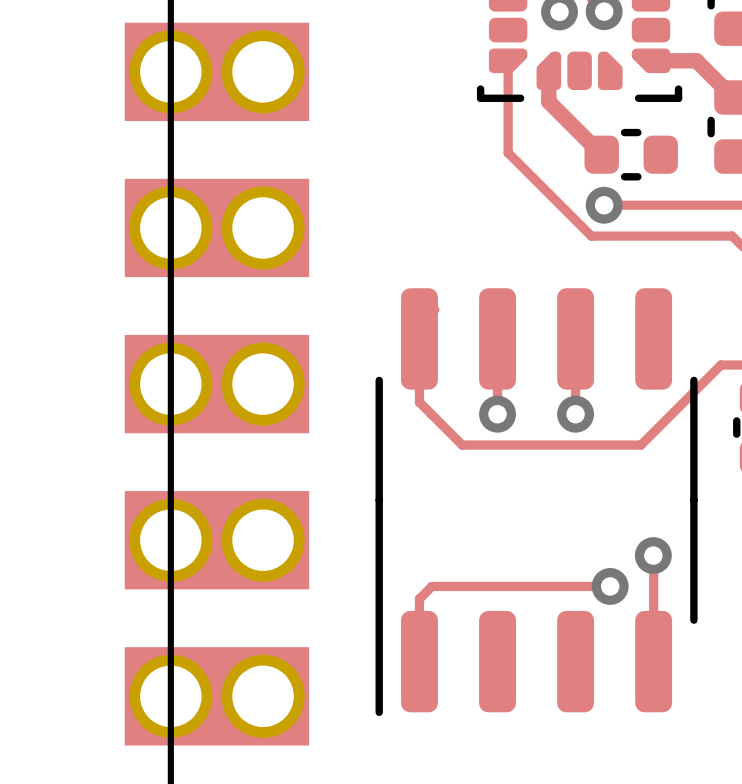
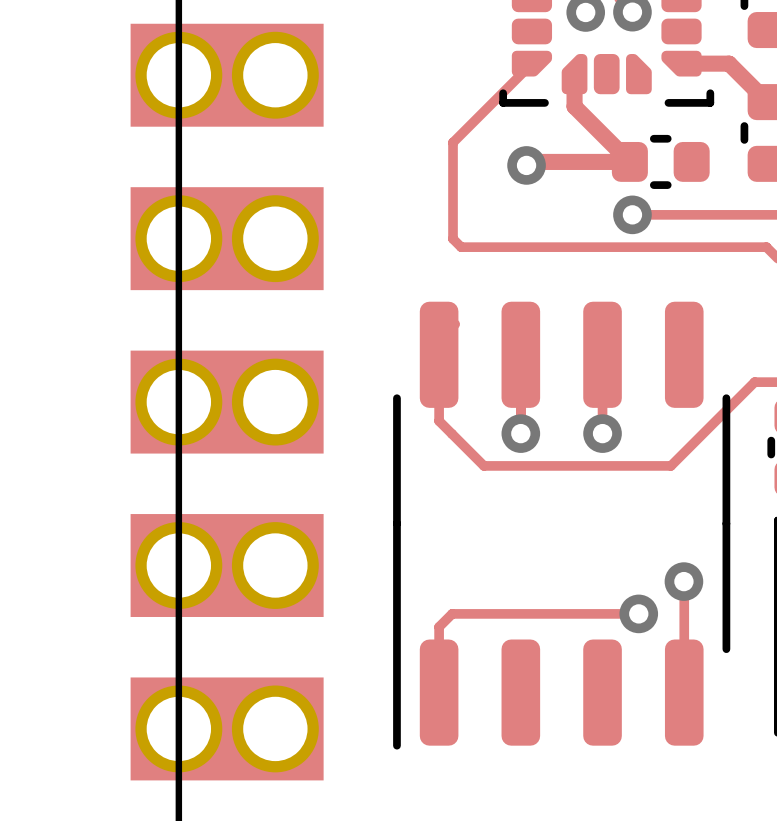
track: (508, 60) (508, 152) (591, 236) -> (531, 63) (453, 142) (453, 238) (461, 247) (619, 247)
track: none -> (629, 161) (530, 161) (526, 165)
via: none -> (526, 165)

